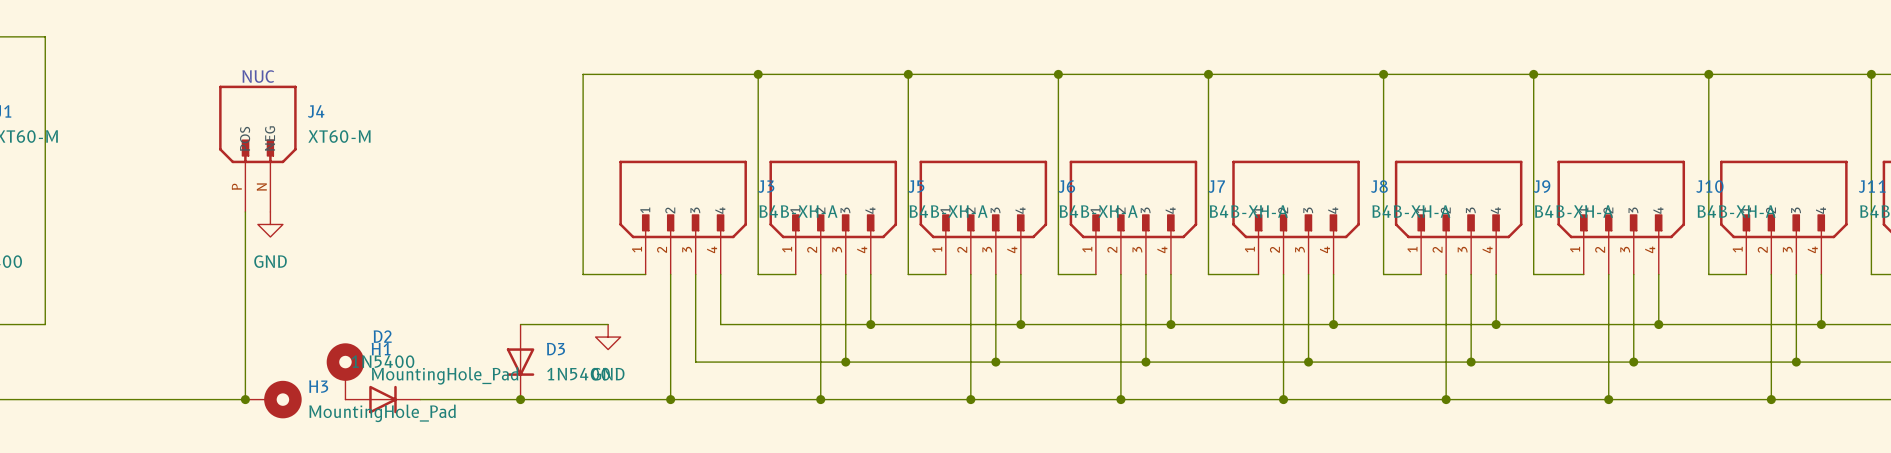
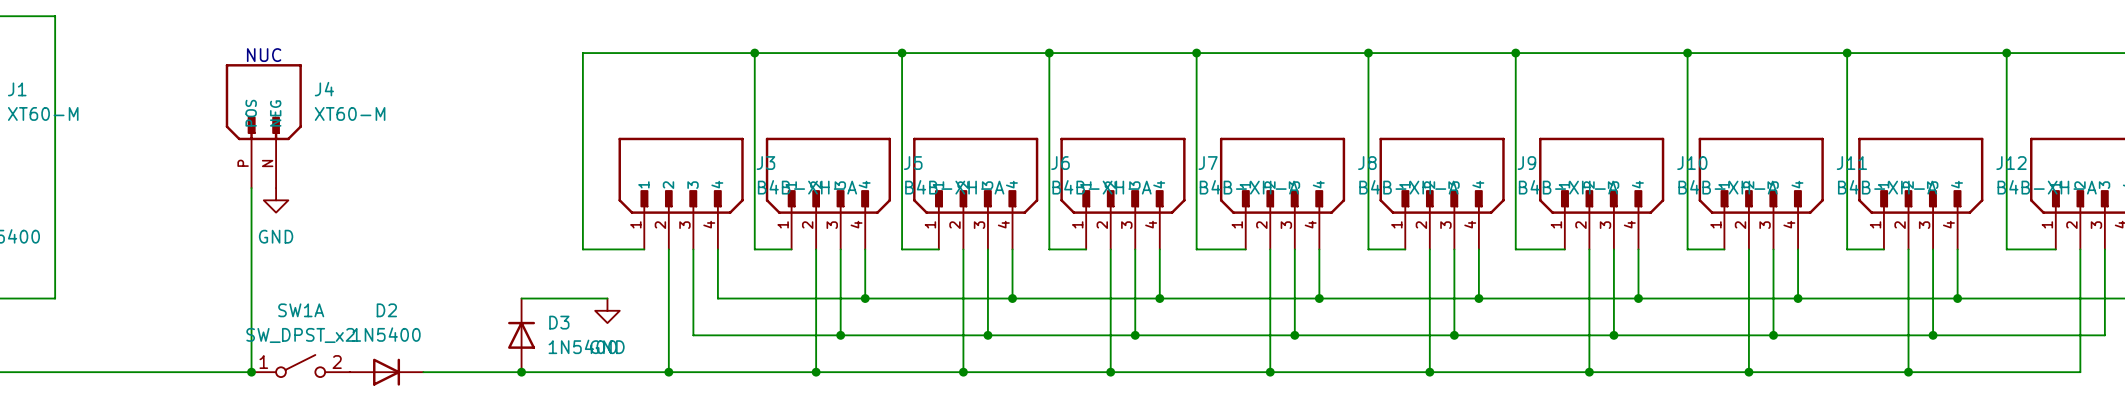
D3 rotation: 0° (520, 362) -> 180° (521, 335)
H1: MountingHole_Pad (345, 371) -> none
SW1A: none -> SW_DPST_x2 (300, 366)
H3: MountingHole_Pad (273, 399) -> none

